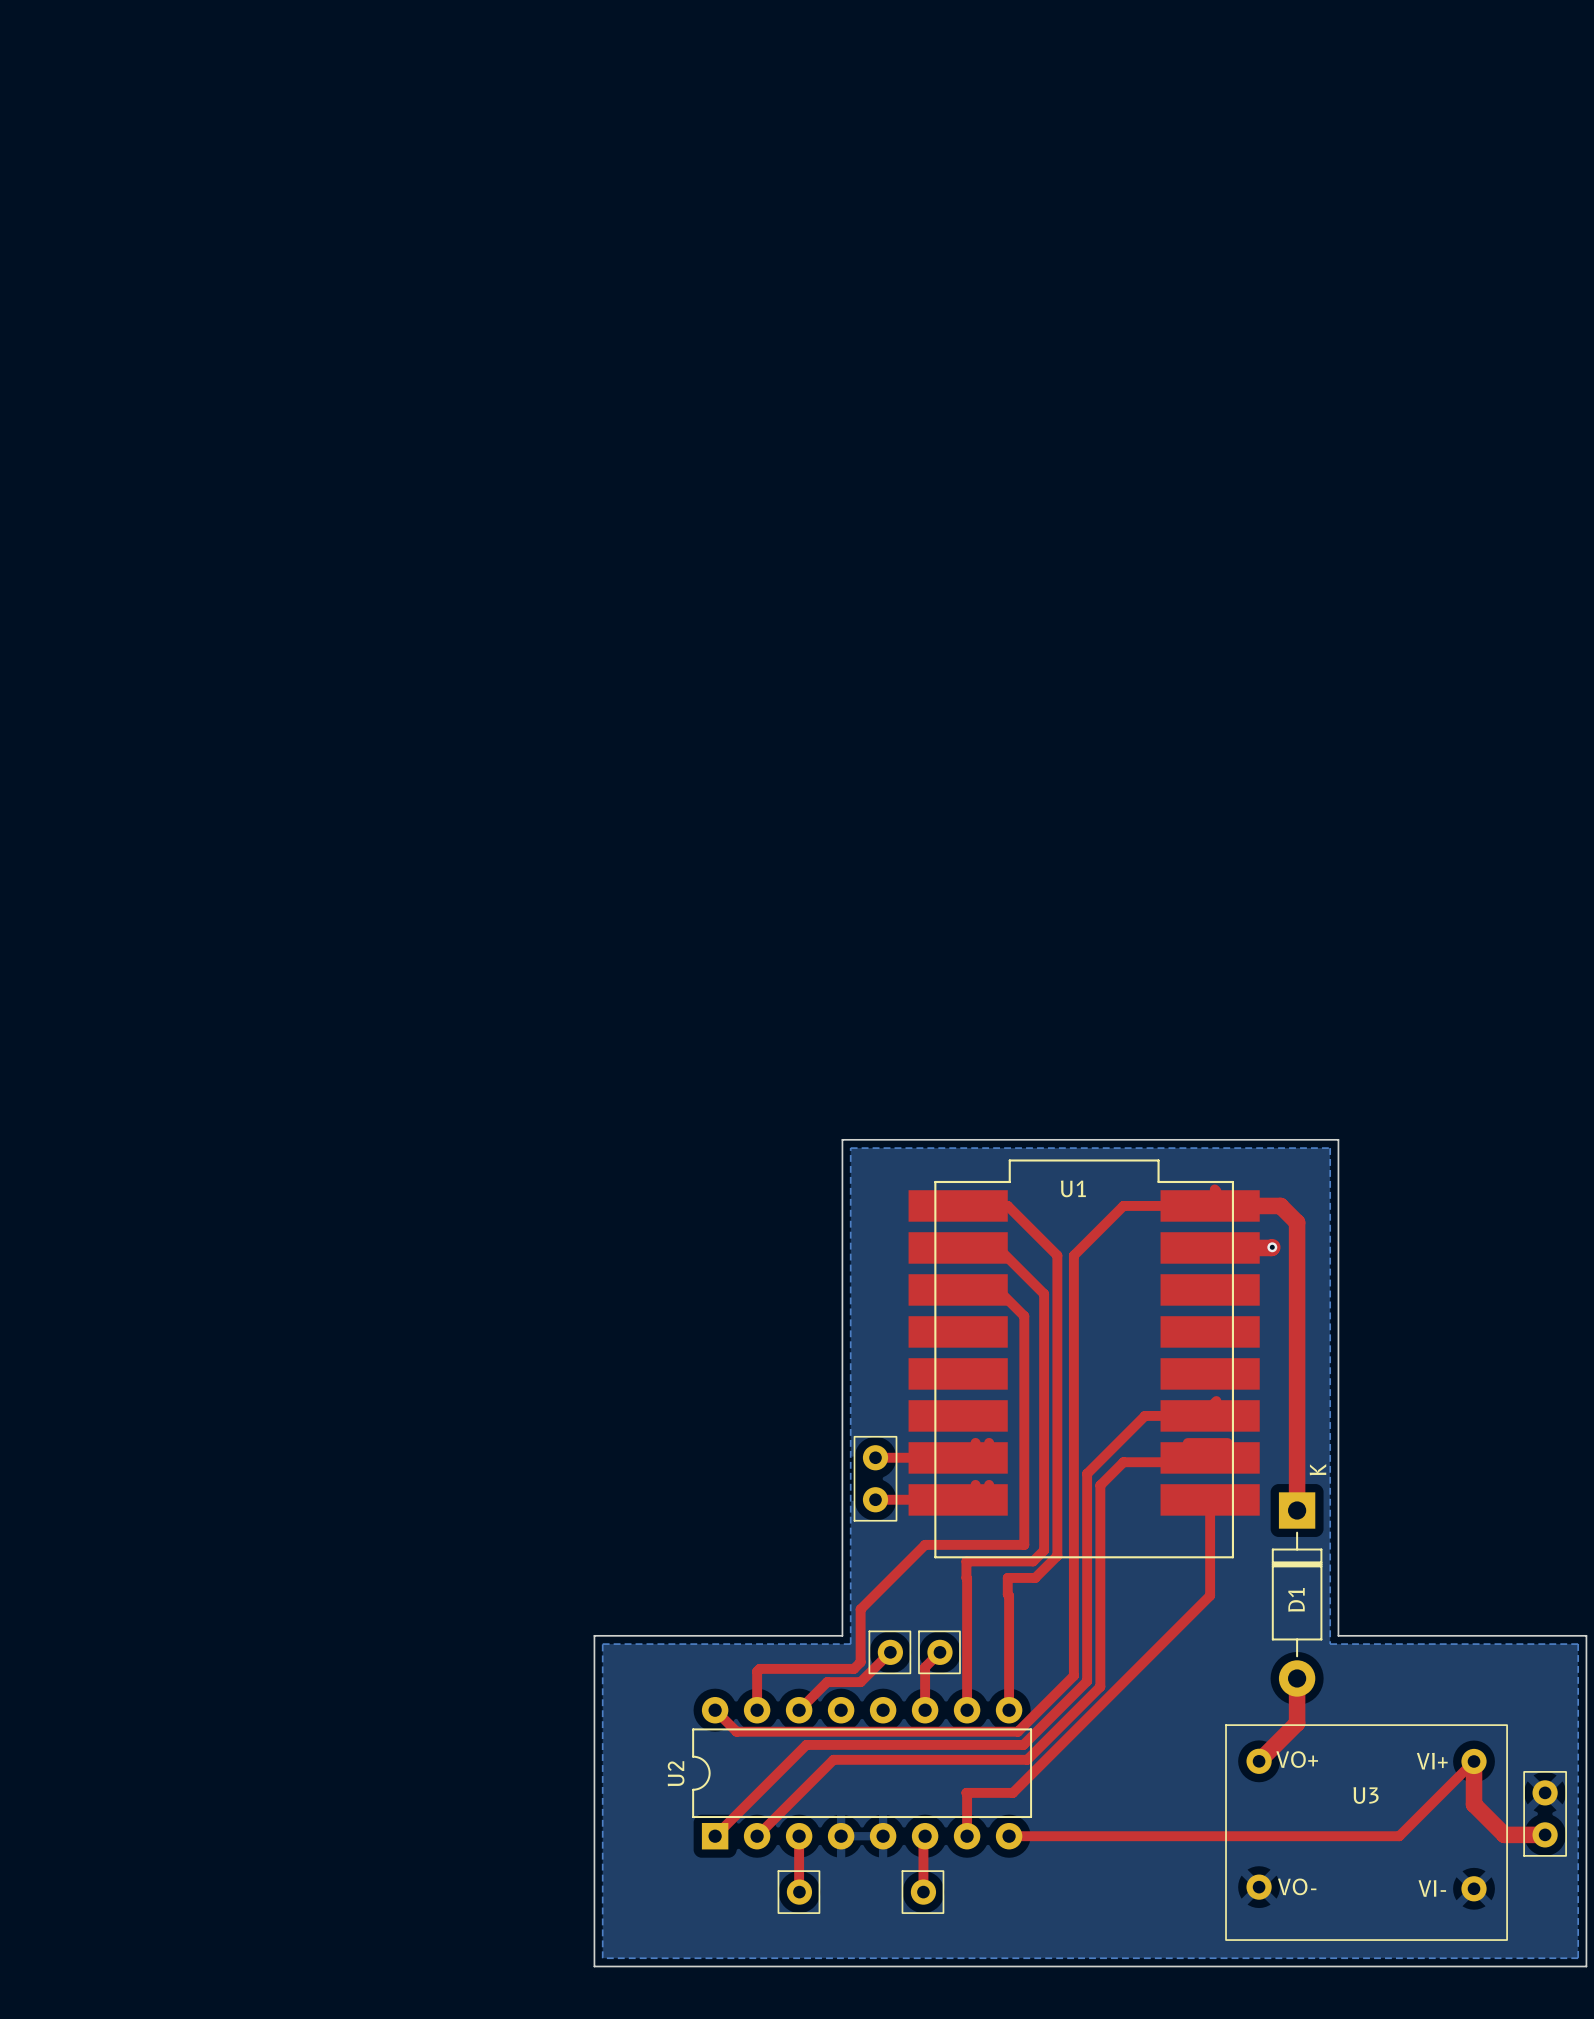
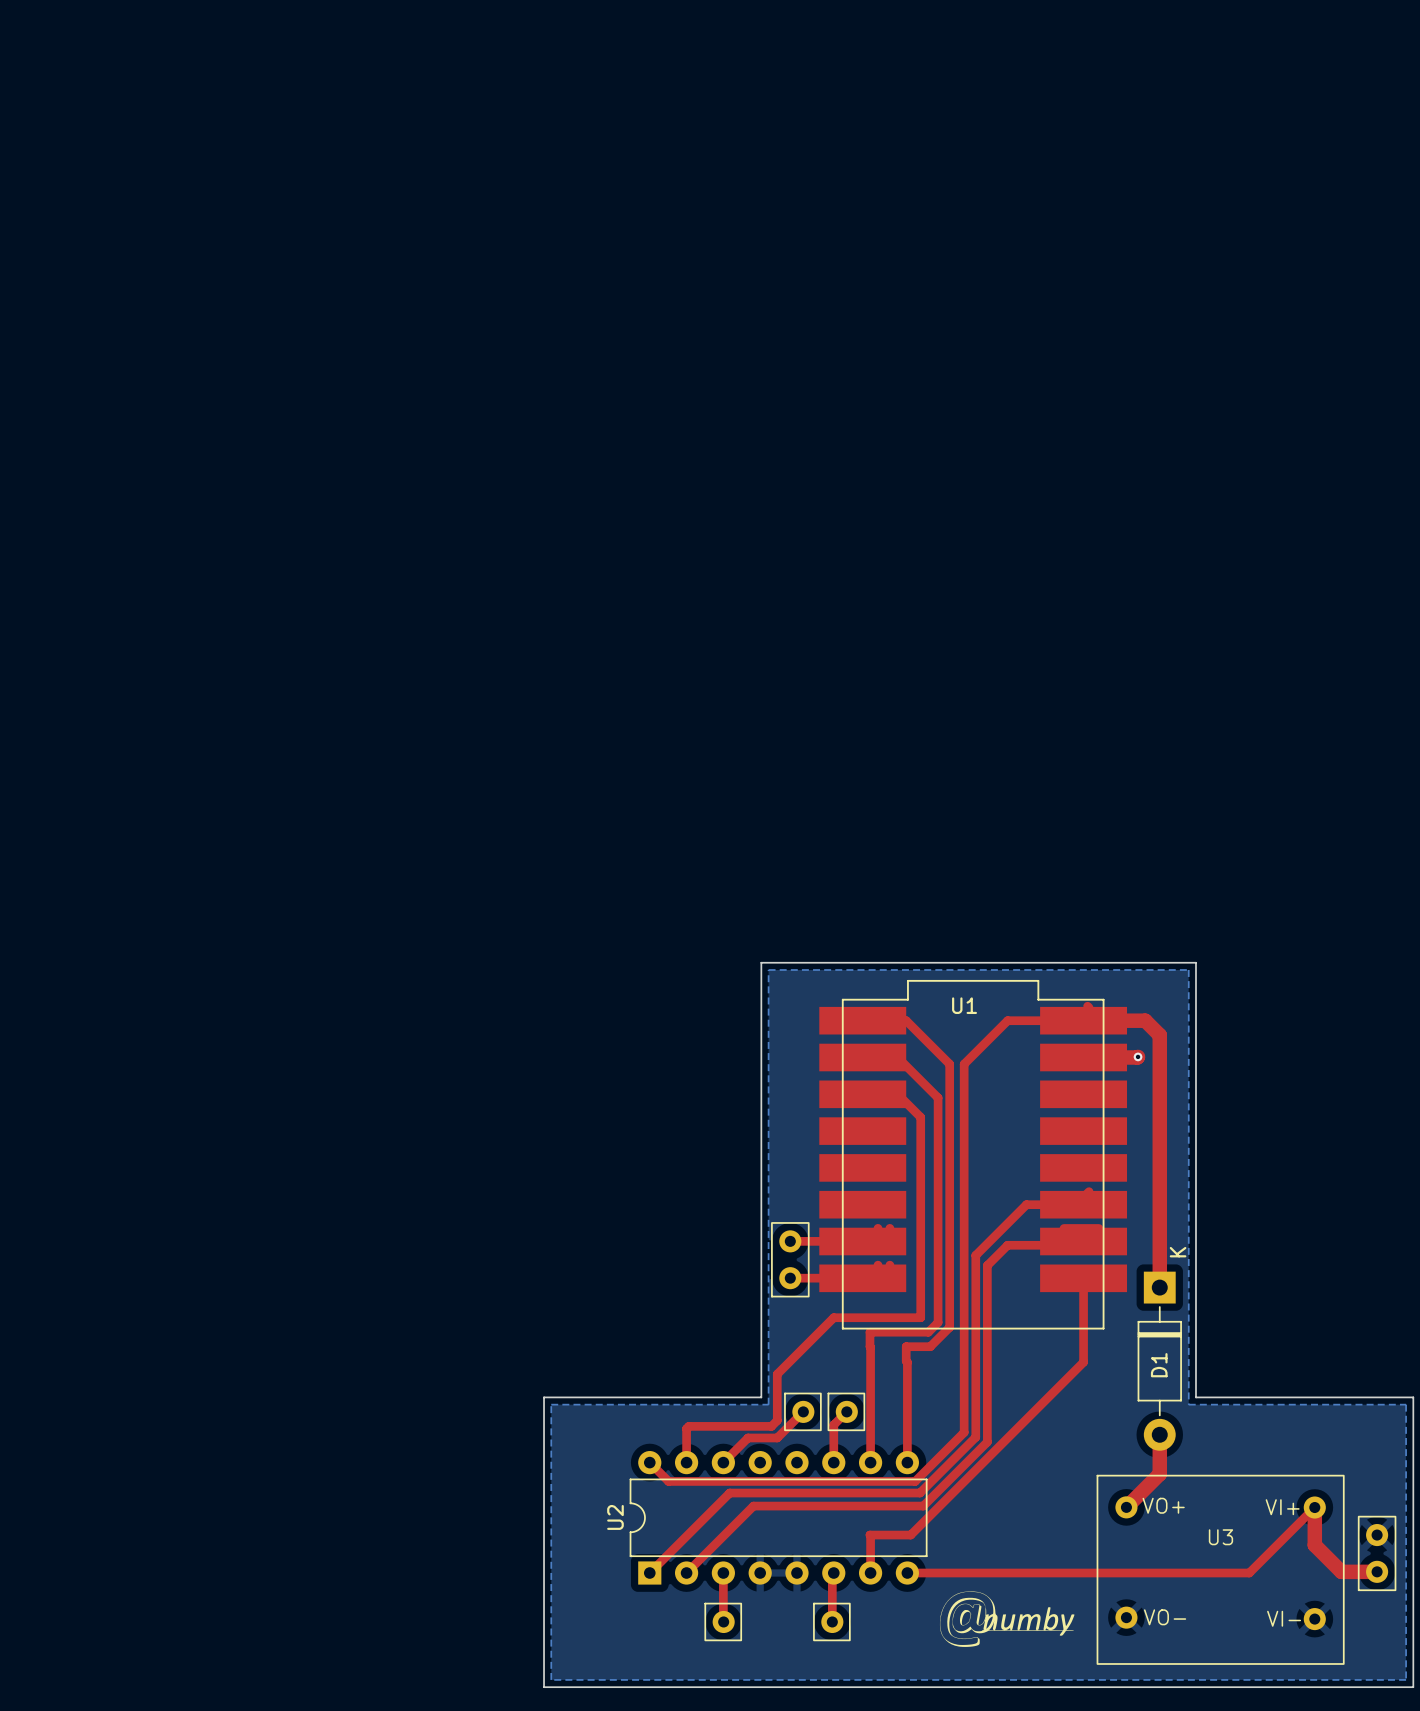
drawing: none -> [939, 1591, 1075, 1647]

